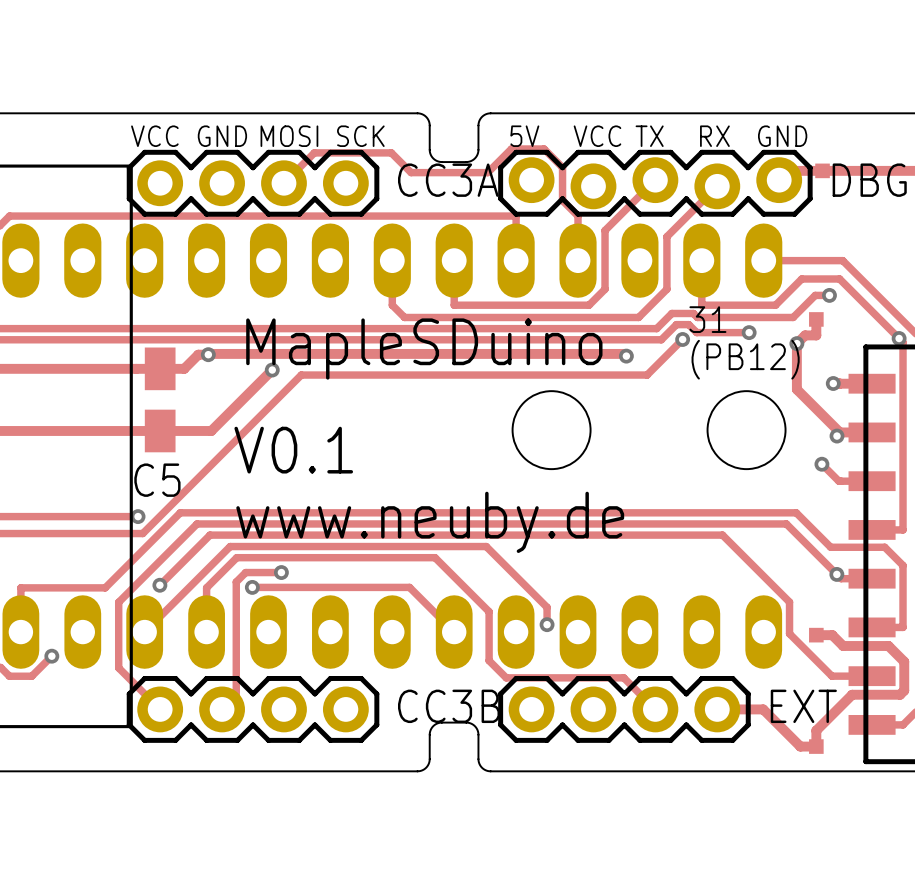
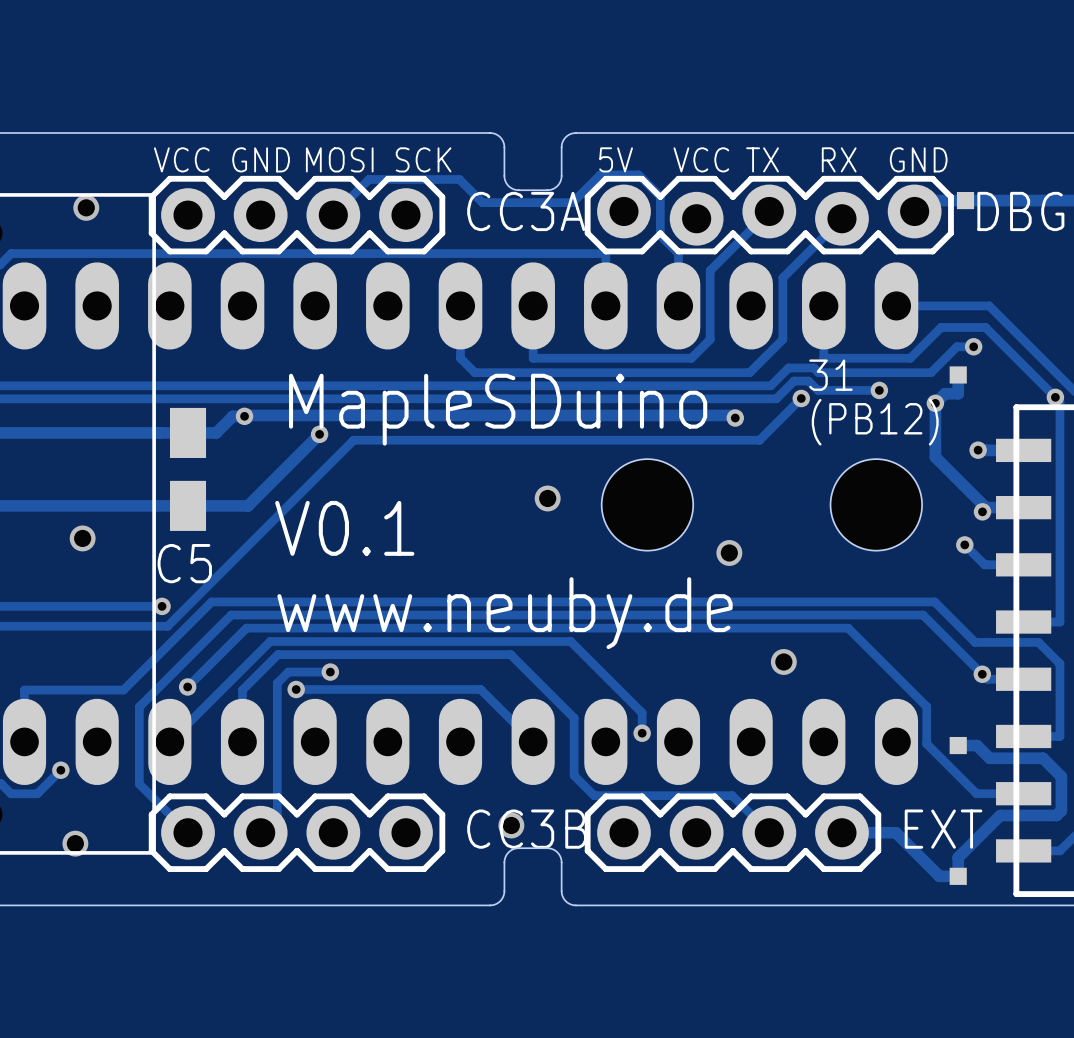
via: none -> (86, 207)
via: none -> (547, 498)
via: none -> (82, 538)
via: none -> (729, 552)
via: none -> (783, 661)
via: none -> (511, 825)
via: none -> (75, 843)

